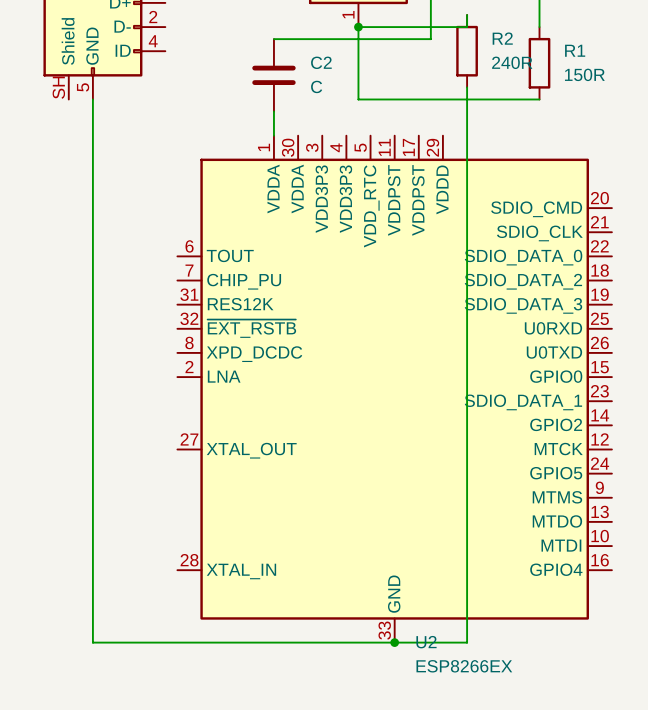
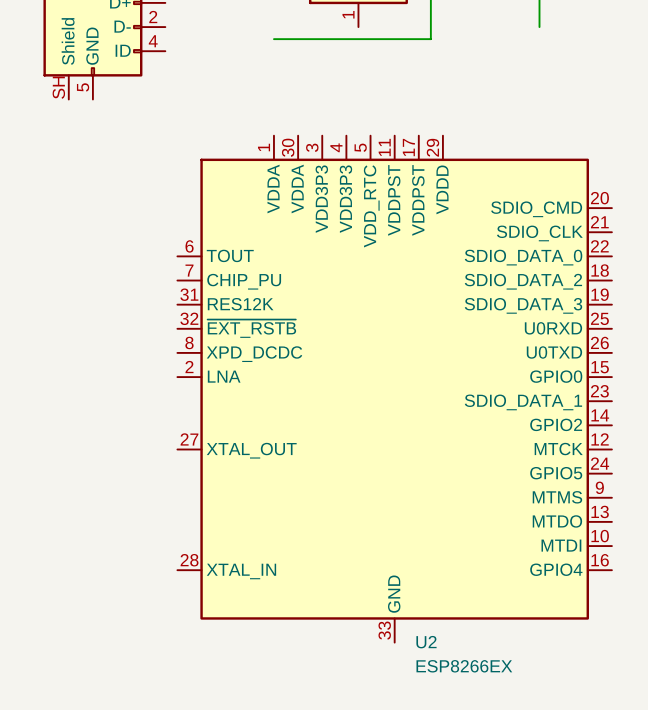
wire: (467, 14) (467, 27) (358, 27) (358, 99) (539, 99) -> none
junction: (358, 27) -> none
R2: 240R (467, 51) -> none
R1: 150R (539, 63) -> none
C2: C (273, 75) -> none
wire: (467, 87) (467, 642) (92, 642) (92, 99) -> none
wire: (273, 111) (273, 135) -> none
junction: (394, 642) -> none

